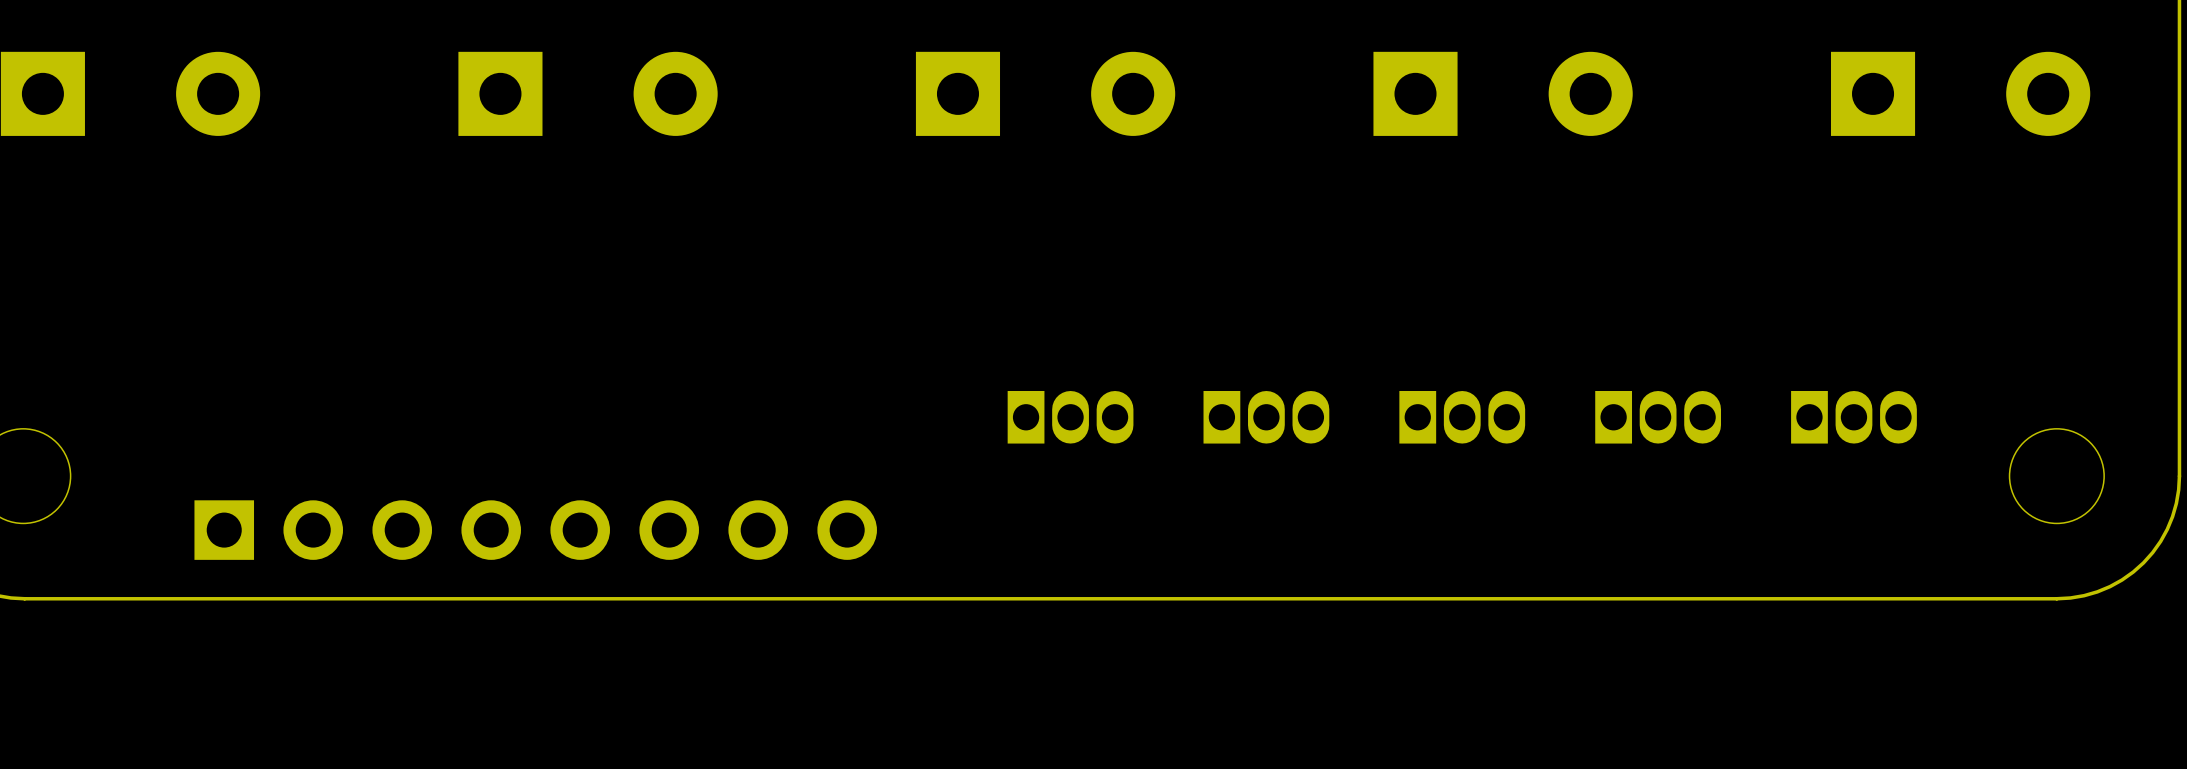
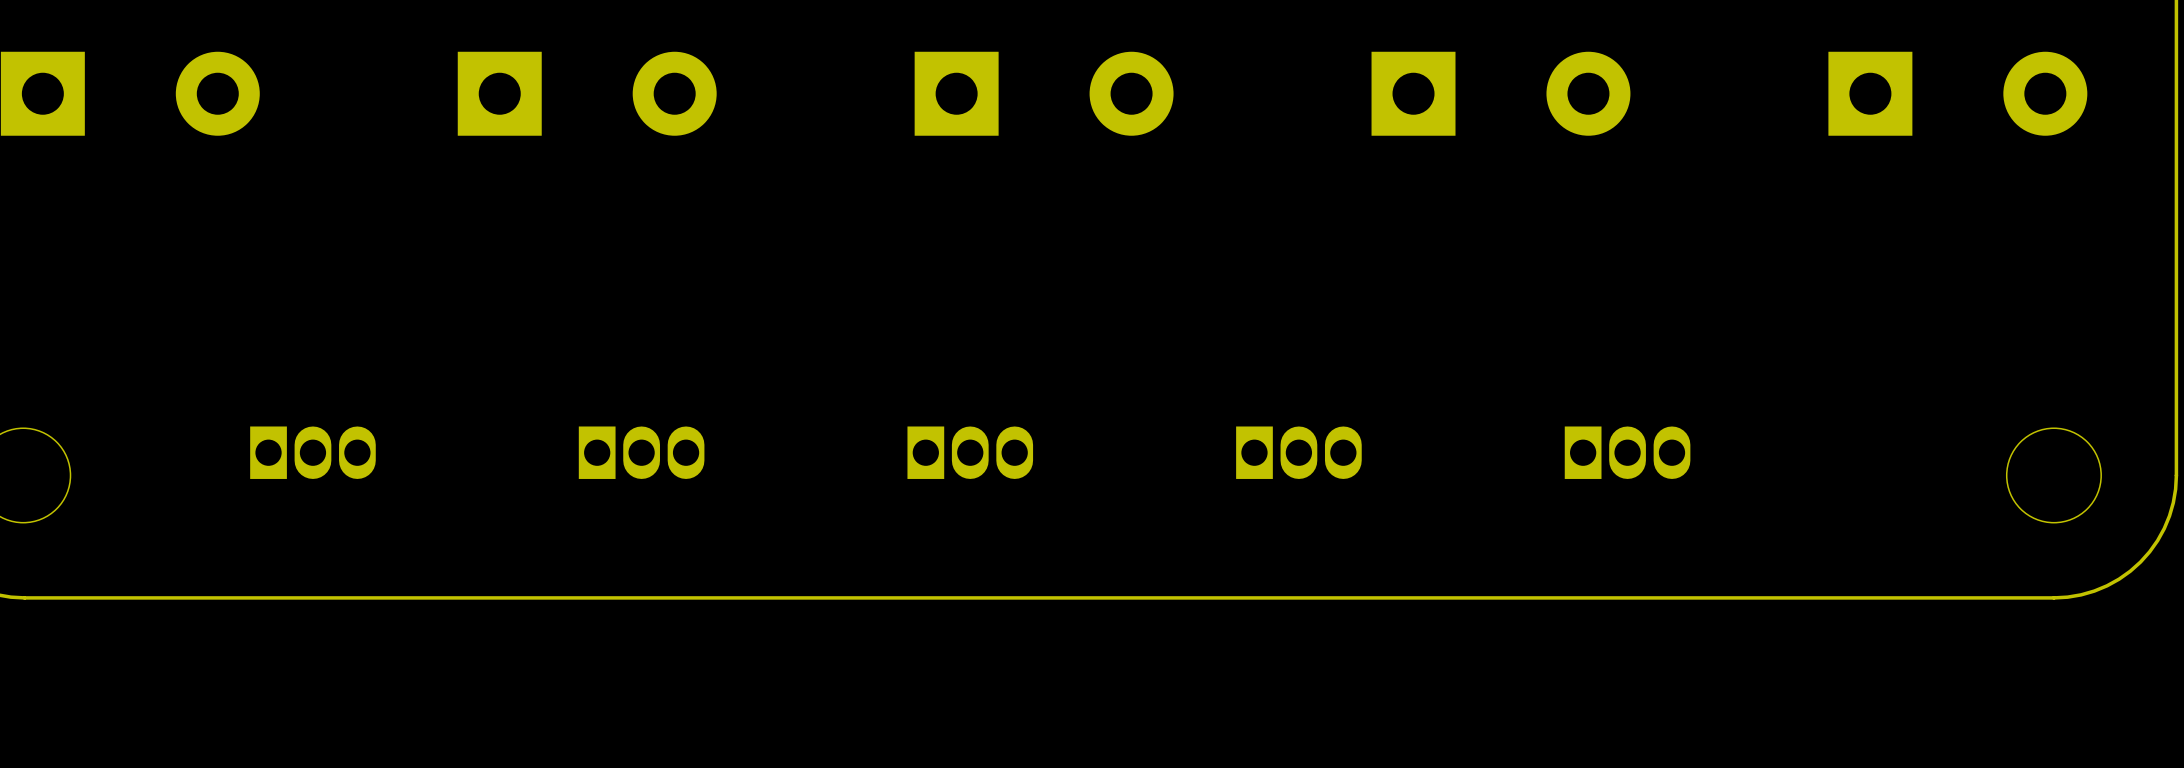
part position: (1070, 417) -> (970, 452)
part position: (1266, 417) -> (1298, 452)
part: (1462, 417) -> none
part position: (1658, 417) -> (1627, 452)
part: (1853, 417) -> none
part: none -> (312, 452)
part: none -> (641, 452)
part: (535, 530) -> none

